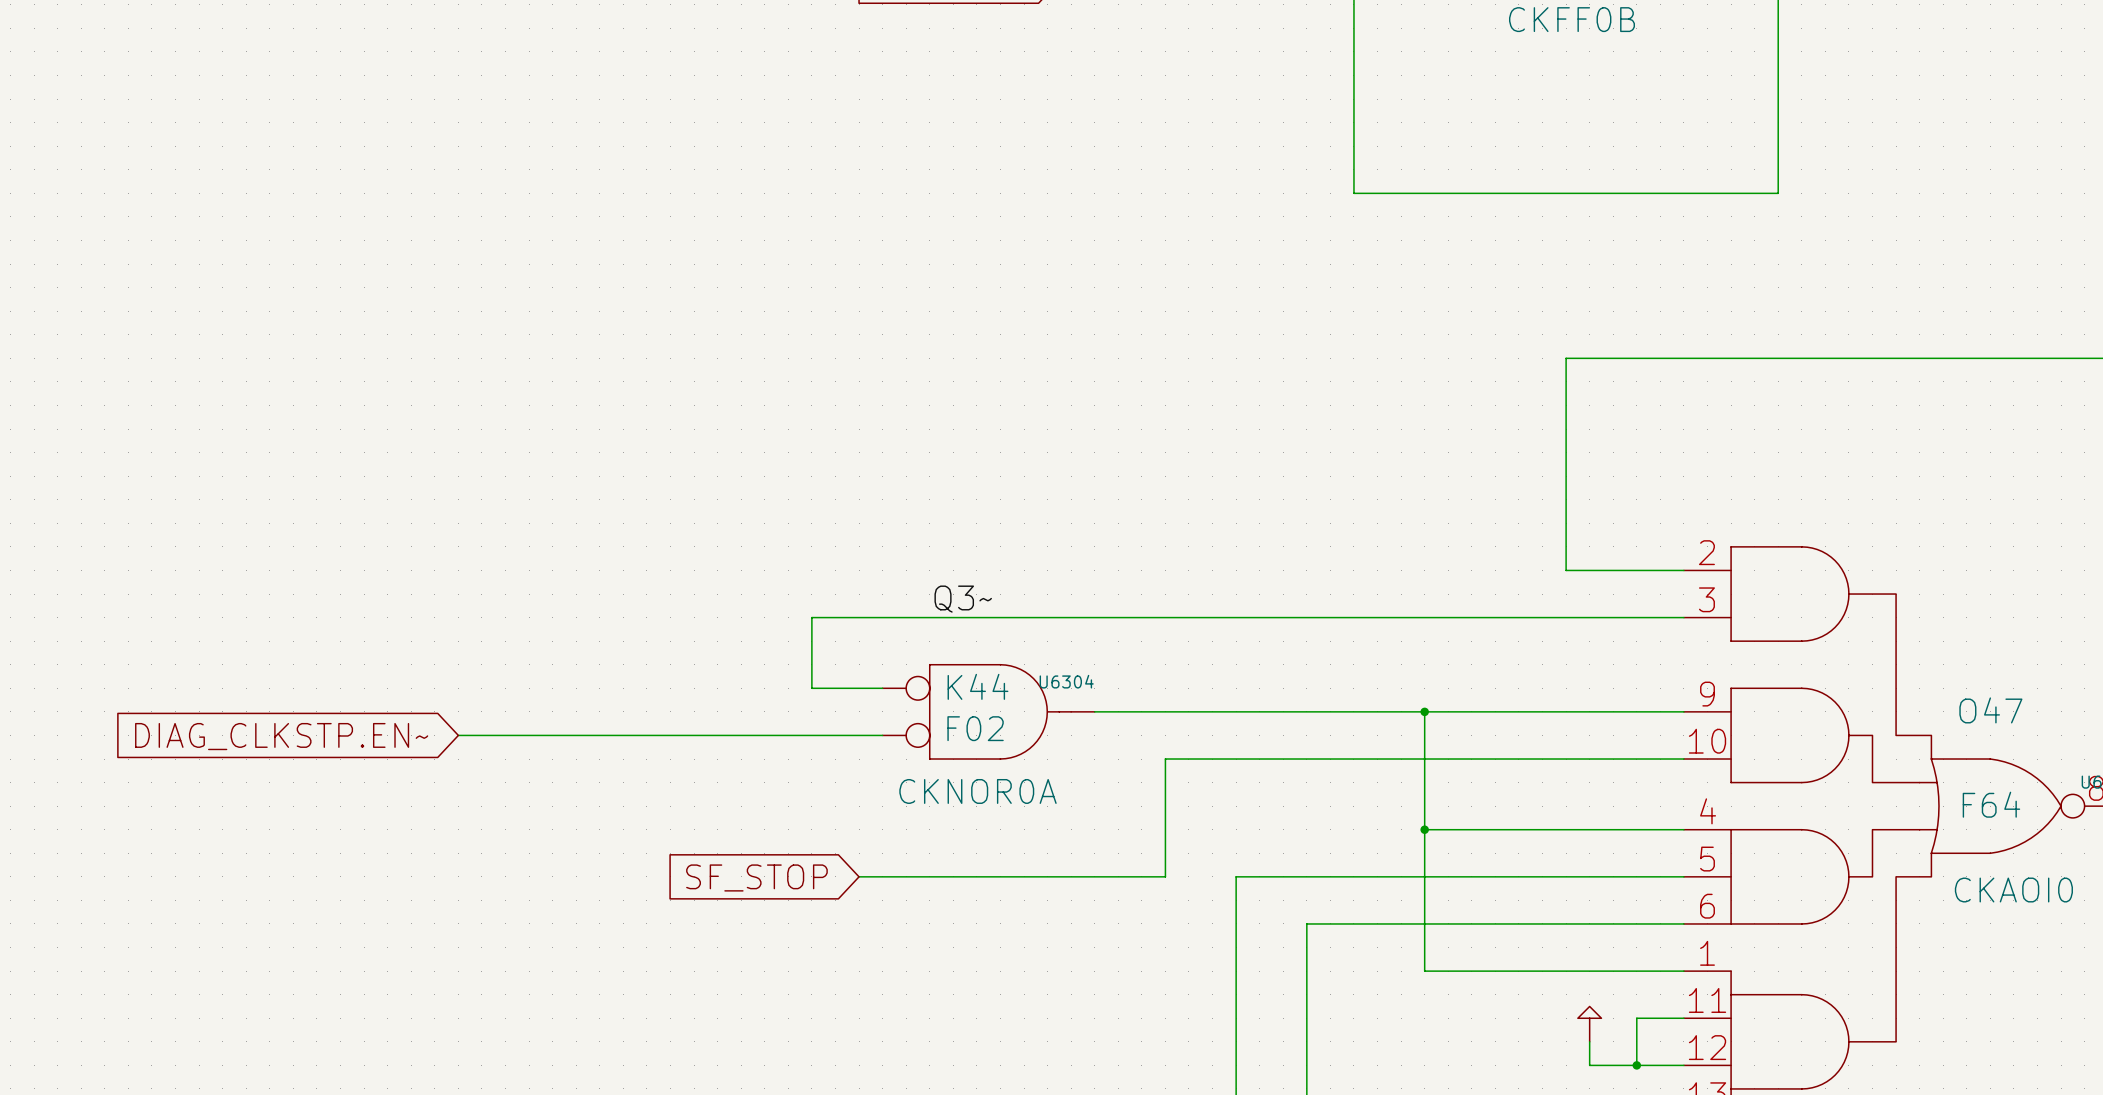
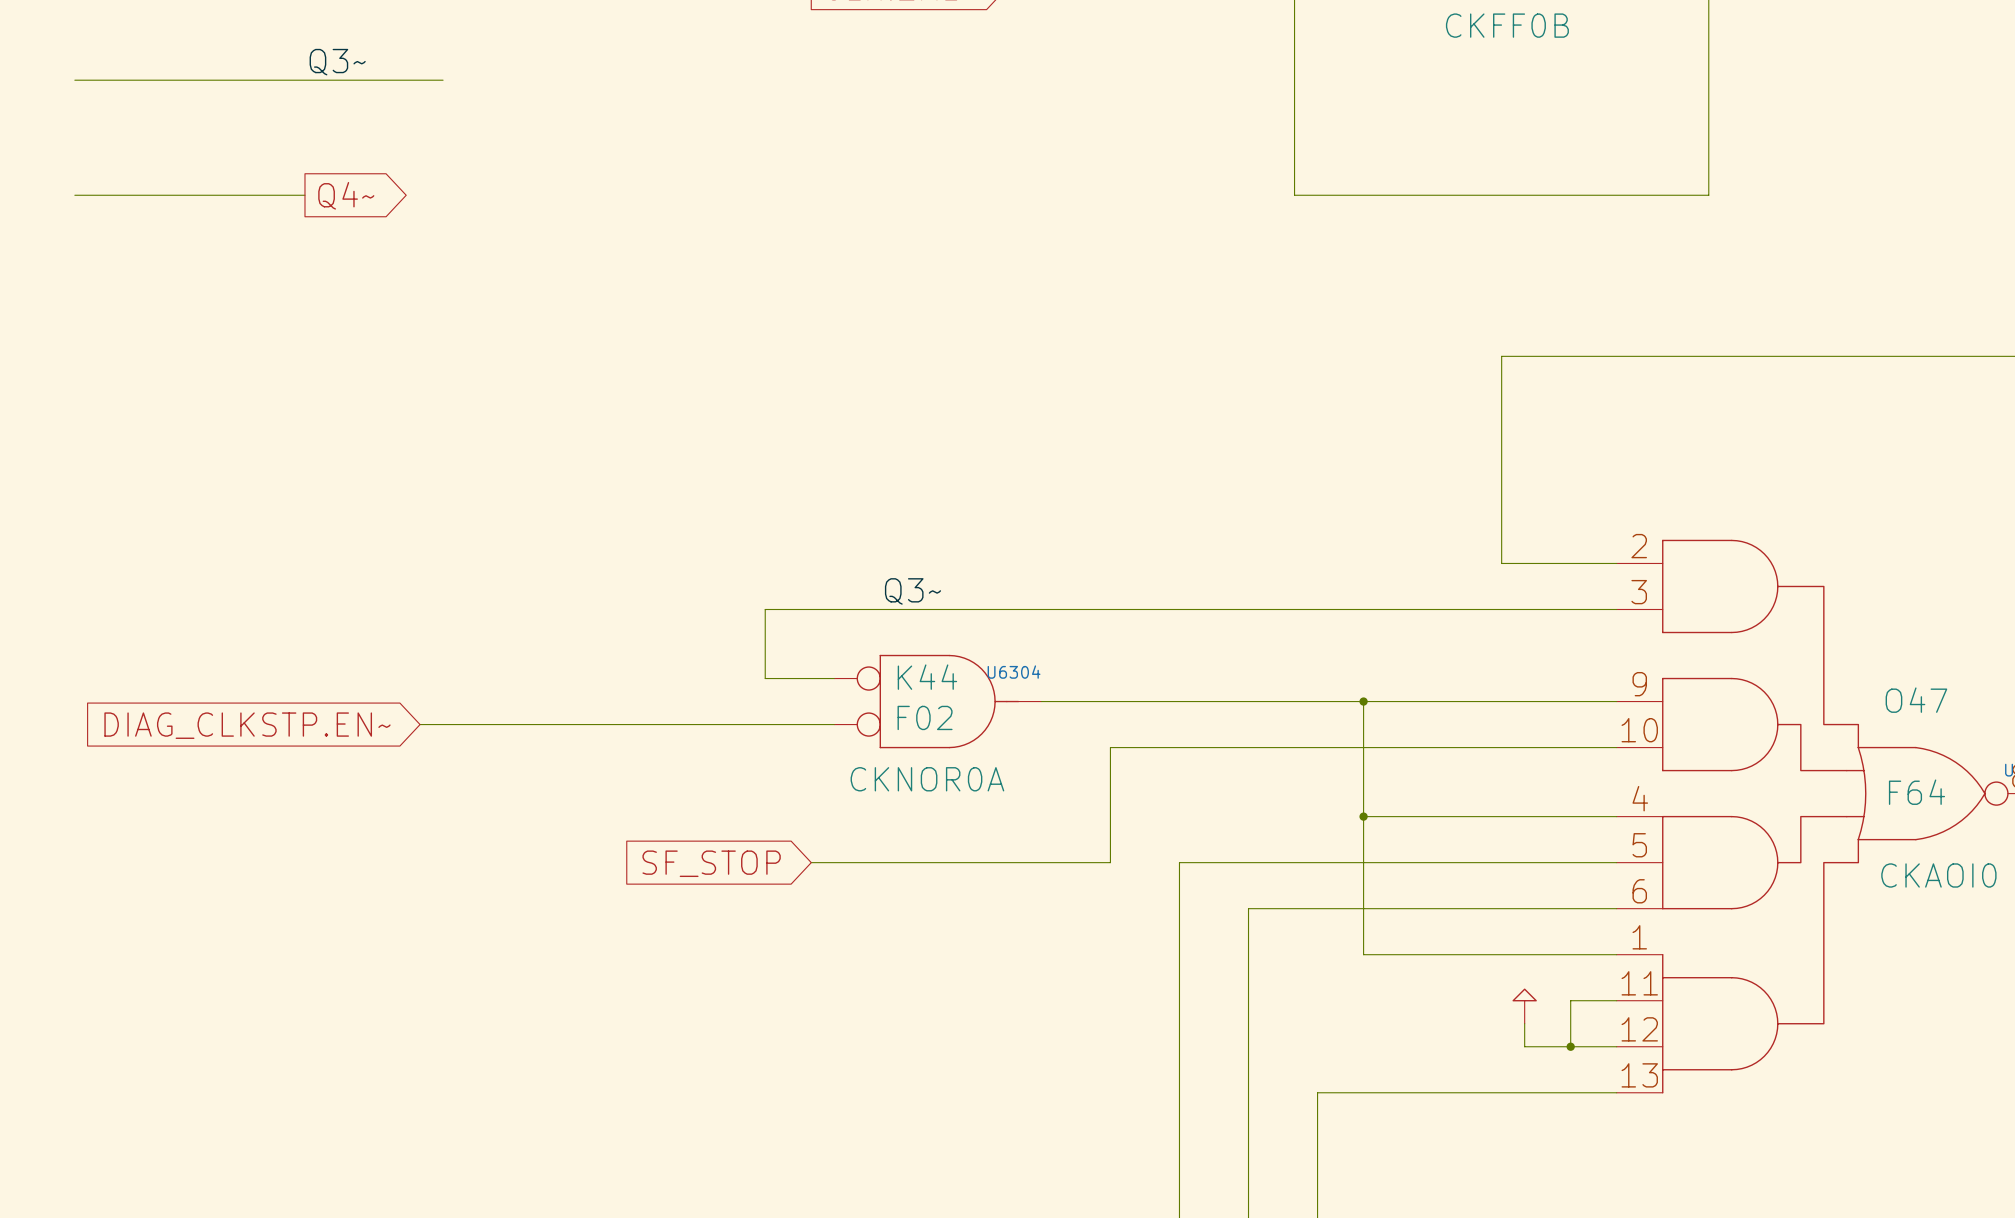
label: none -> Q3~ (337, 62)
wire: none -> (74, 80) (443, 80)
wire: none -> (74, 195) (304, 195)
global label: none -> Q4~ (346, 195)

